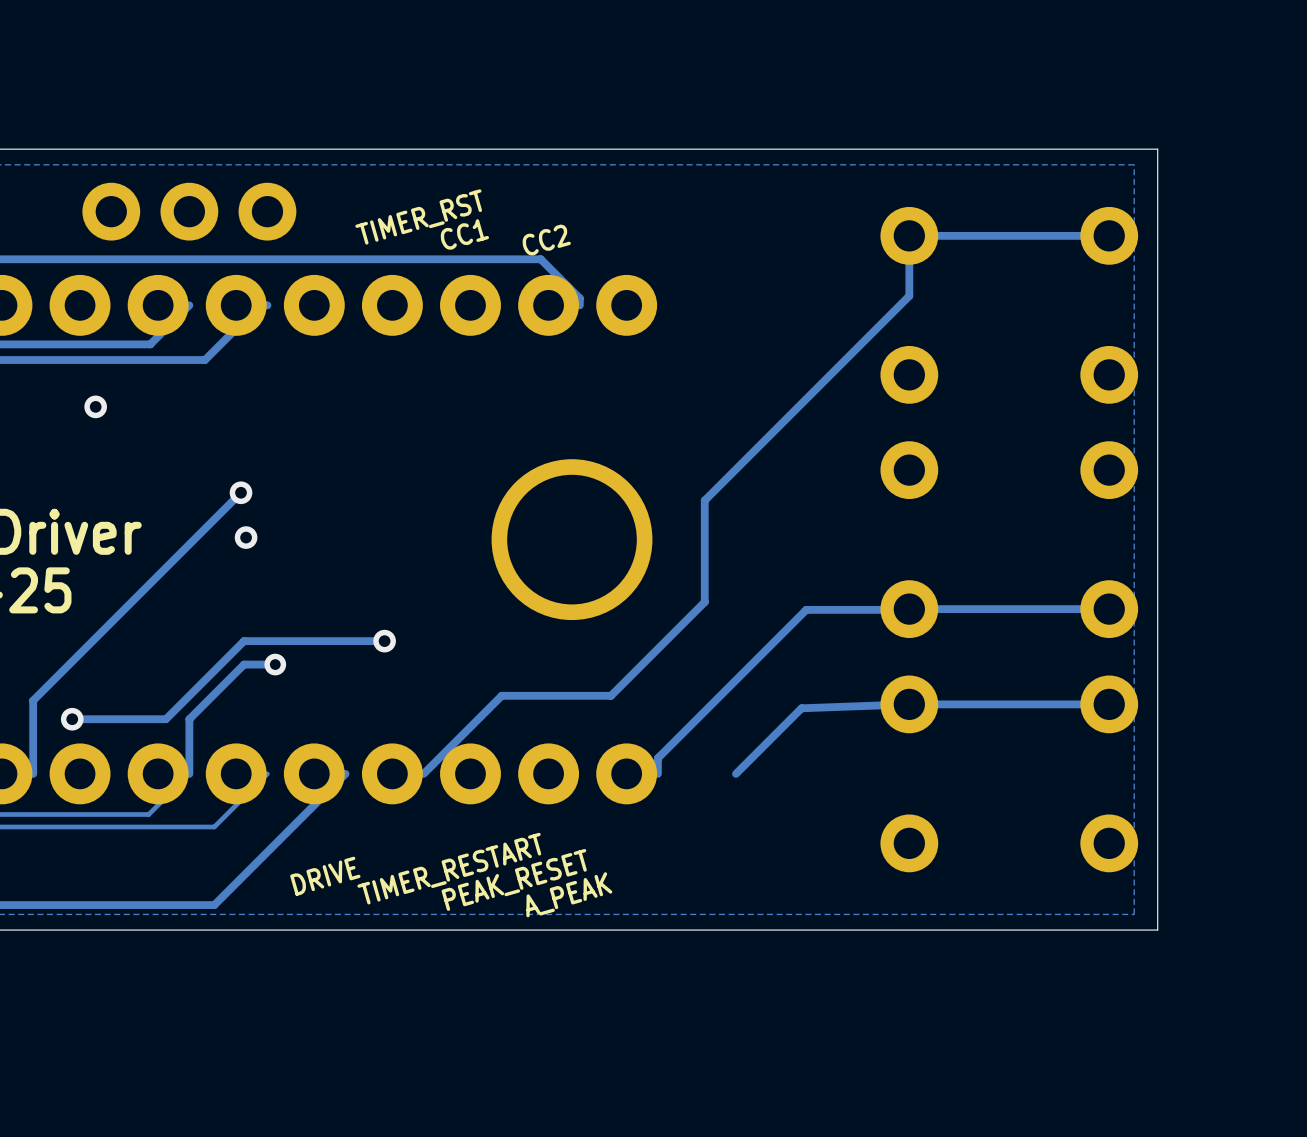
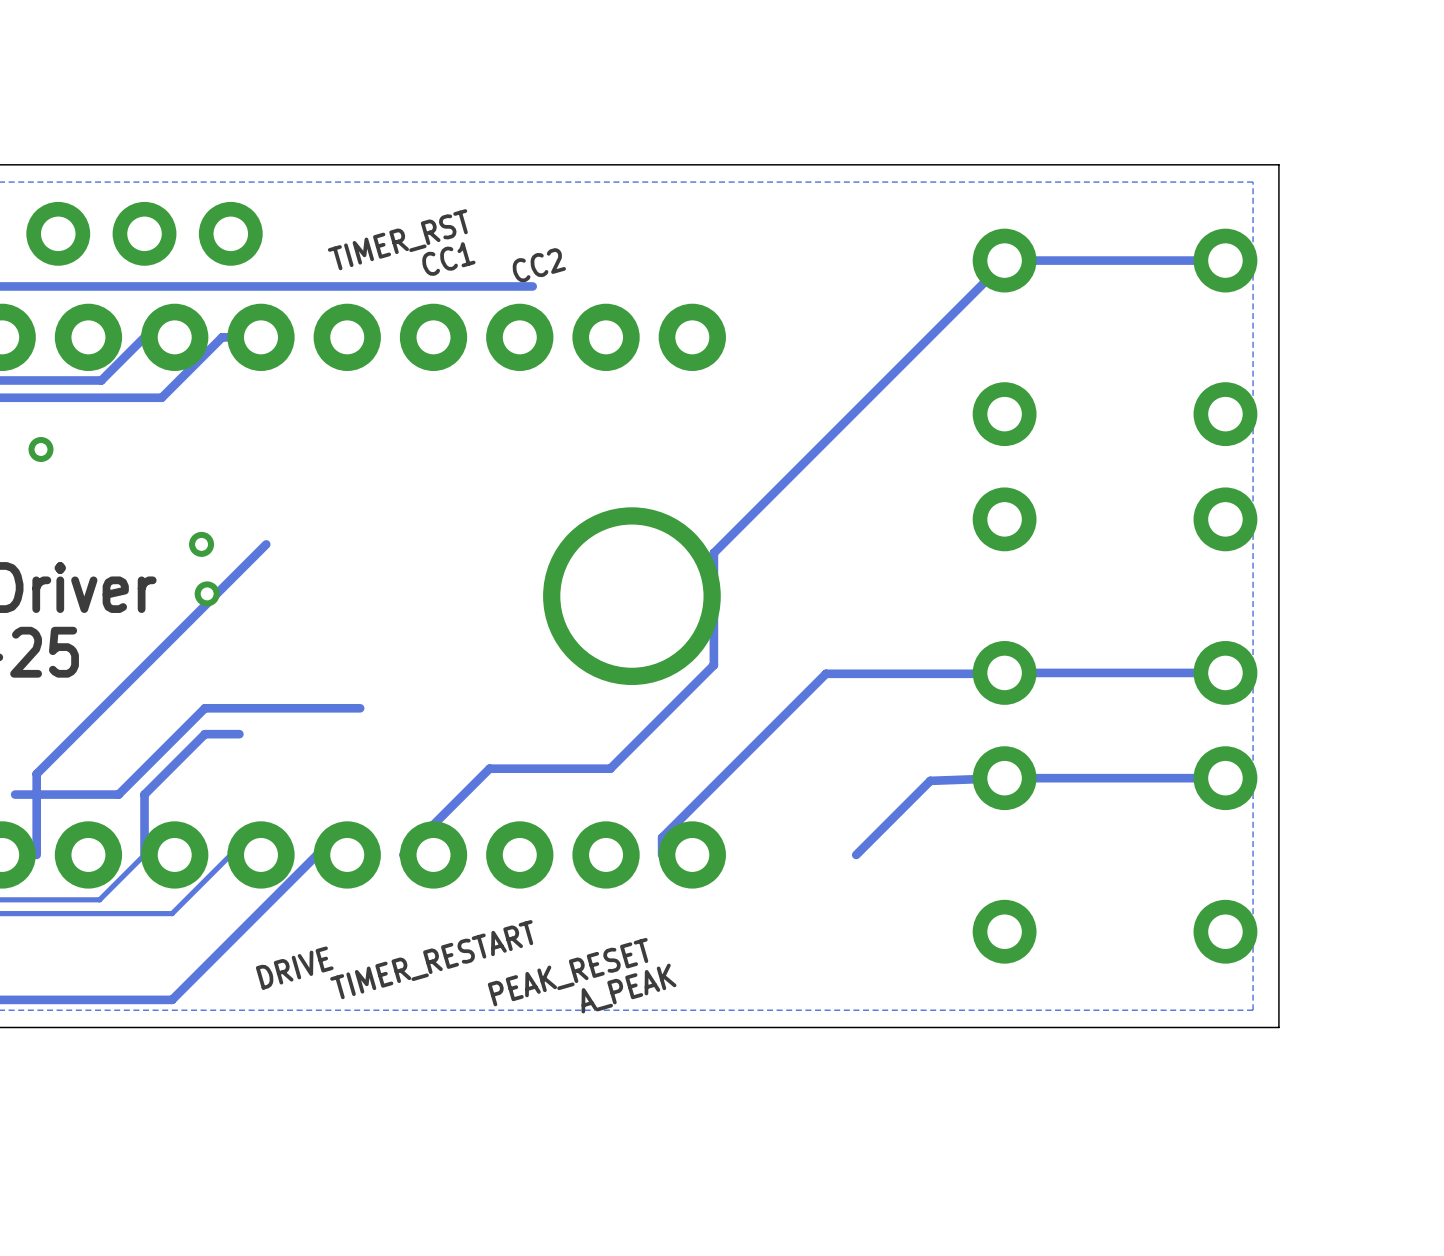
part position: (189, 211) -> (144, 233)
text position: TIMER_RST (418, 216) -> TIMER_RST (397, 239)
text position: CC1 (464, 234) -> CC1 (448, 259)
track: (909, 237) (909, 295) (704, 500) (704, 602) (611, 695) (552, 695) -> (1004, 262) (713, 553) (713, 665) (610, 768)
text position: CC2 (546, 240) -> CC2 (539, 265)
track: (482, 259) (540, 259) (579, 298) (579, 305) -> none
track: (189, 305) (150, 344) (91, 344) -> (144, 337) (101, 380)
track: (267, 305) (259, 305) (205, 360) (146, 360) -> (230, 337) (222, 337) (161, 397)
via position: (95, 406) -> (41, 449)
via: none -> (201, 544)
via: (241, 492) -> none
via: none -> (207, 593)
via: (246, 537) -> none
track: (806, 609) (657, 758) (657, 773) -> (890, 673) (826, 673) (662, 837) (662, 854)
track: (244, 641) (165, 719) (107, 719) -> (269, 708) (204, 708) (118, 794)
track: (384, 641) (326, 641) -> (79, 794) (15, 794)
via: (384, 641) -> none
track: (275, 664) (244, 664) (189, 719) (189, 773) (148, 814) (90, 814) -> (239, 734) (204, 734) (144, 794) (144, 854) (99, 899)
via: (275, 664) -> none
track: (501, 695) (423, 773) -> (554, 768) (489, 768) (403, 854)
track: (842, 706) (801, 708) (735, 773) -> (930, 780) (856, 854)
via: (72, 719) -> none
track: (267, 773) (214, 826) (155, 826) -> (230, 854) (172, 913)
track: (345, 773) (214, 905) (155, 905) -> (317, 854) (172, 999)
text position: TIMER_RESTART (449, 868) -> TIMER_RESTART (431, 959)
text position: DRIVE (325, 876) -> DRIVE (294, 968)

